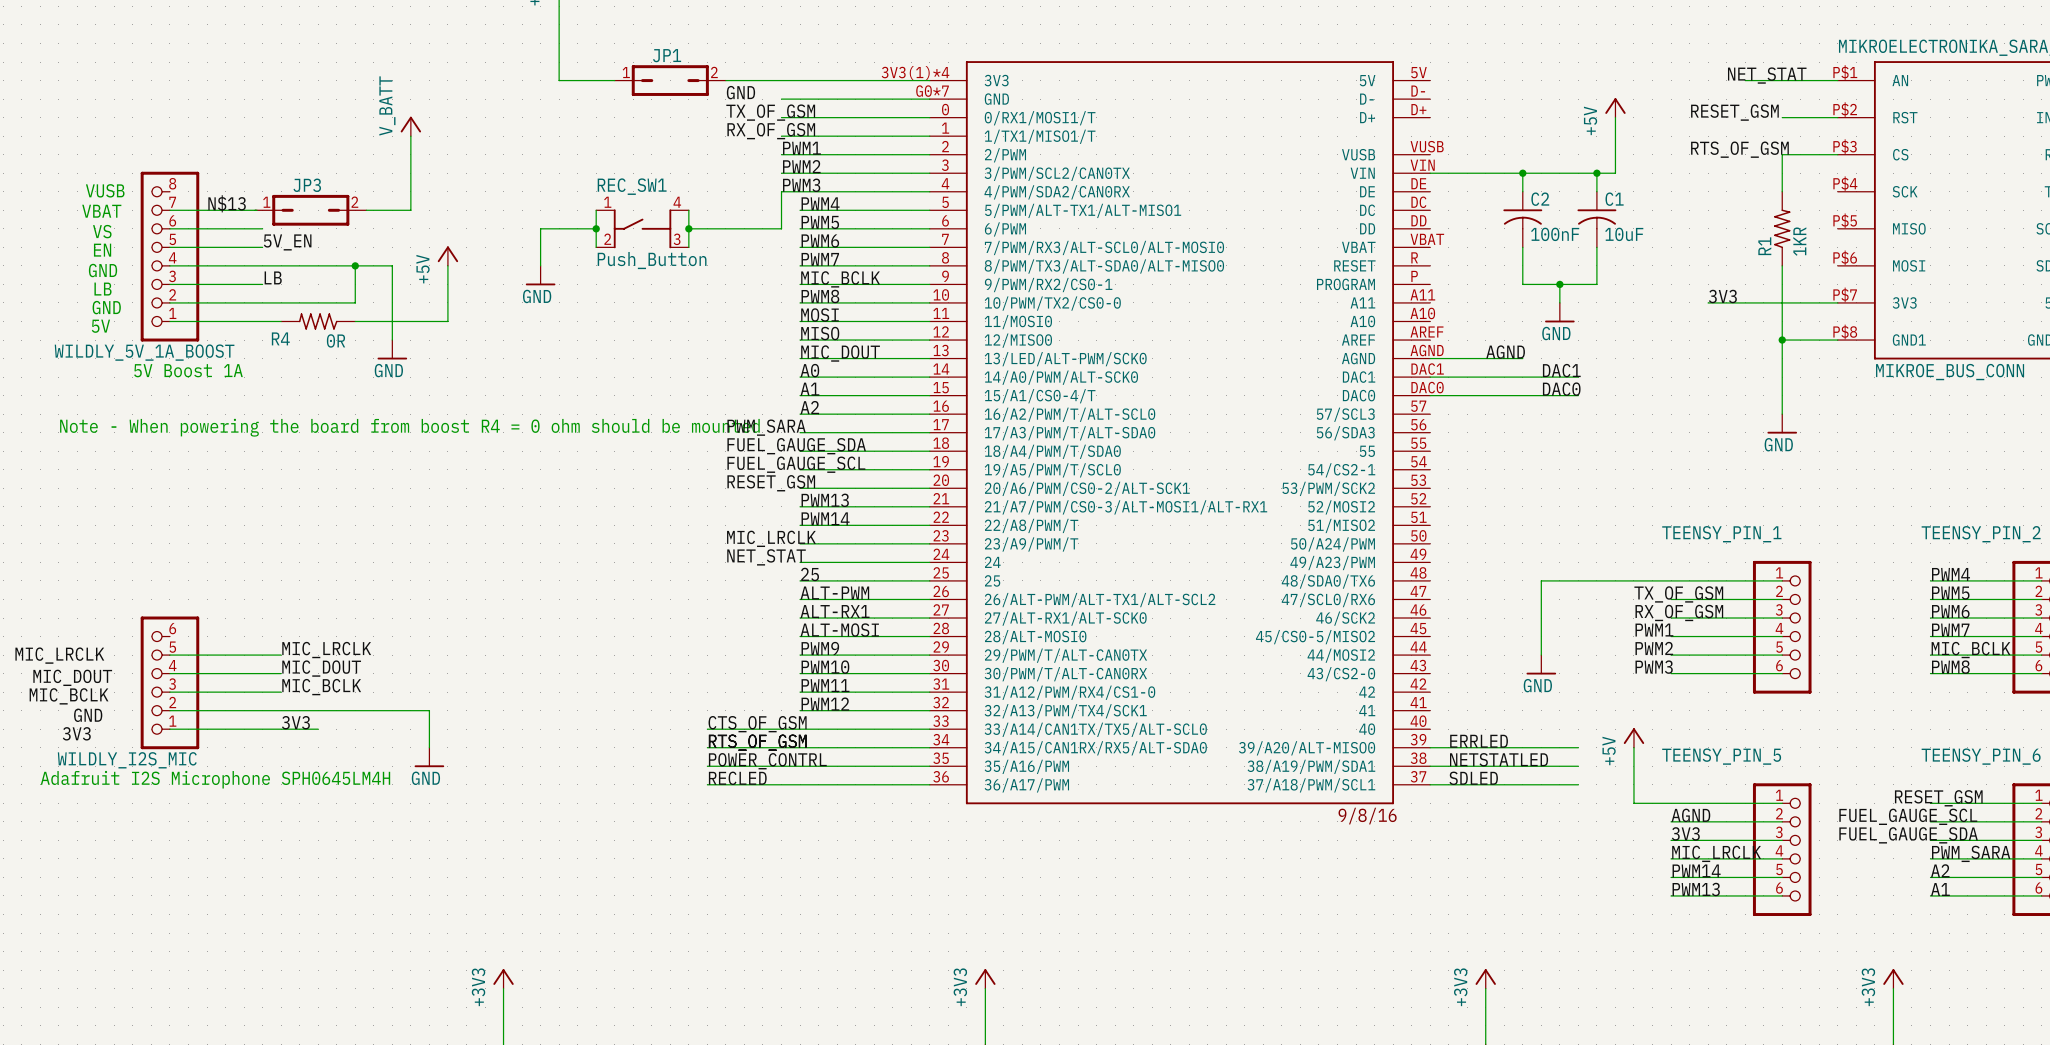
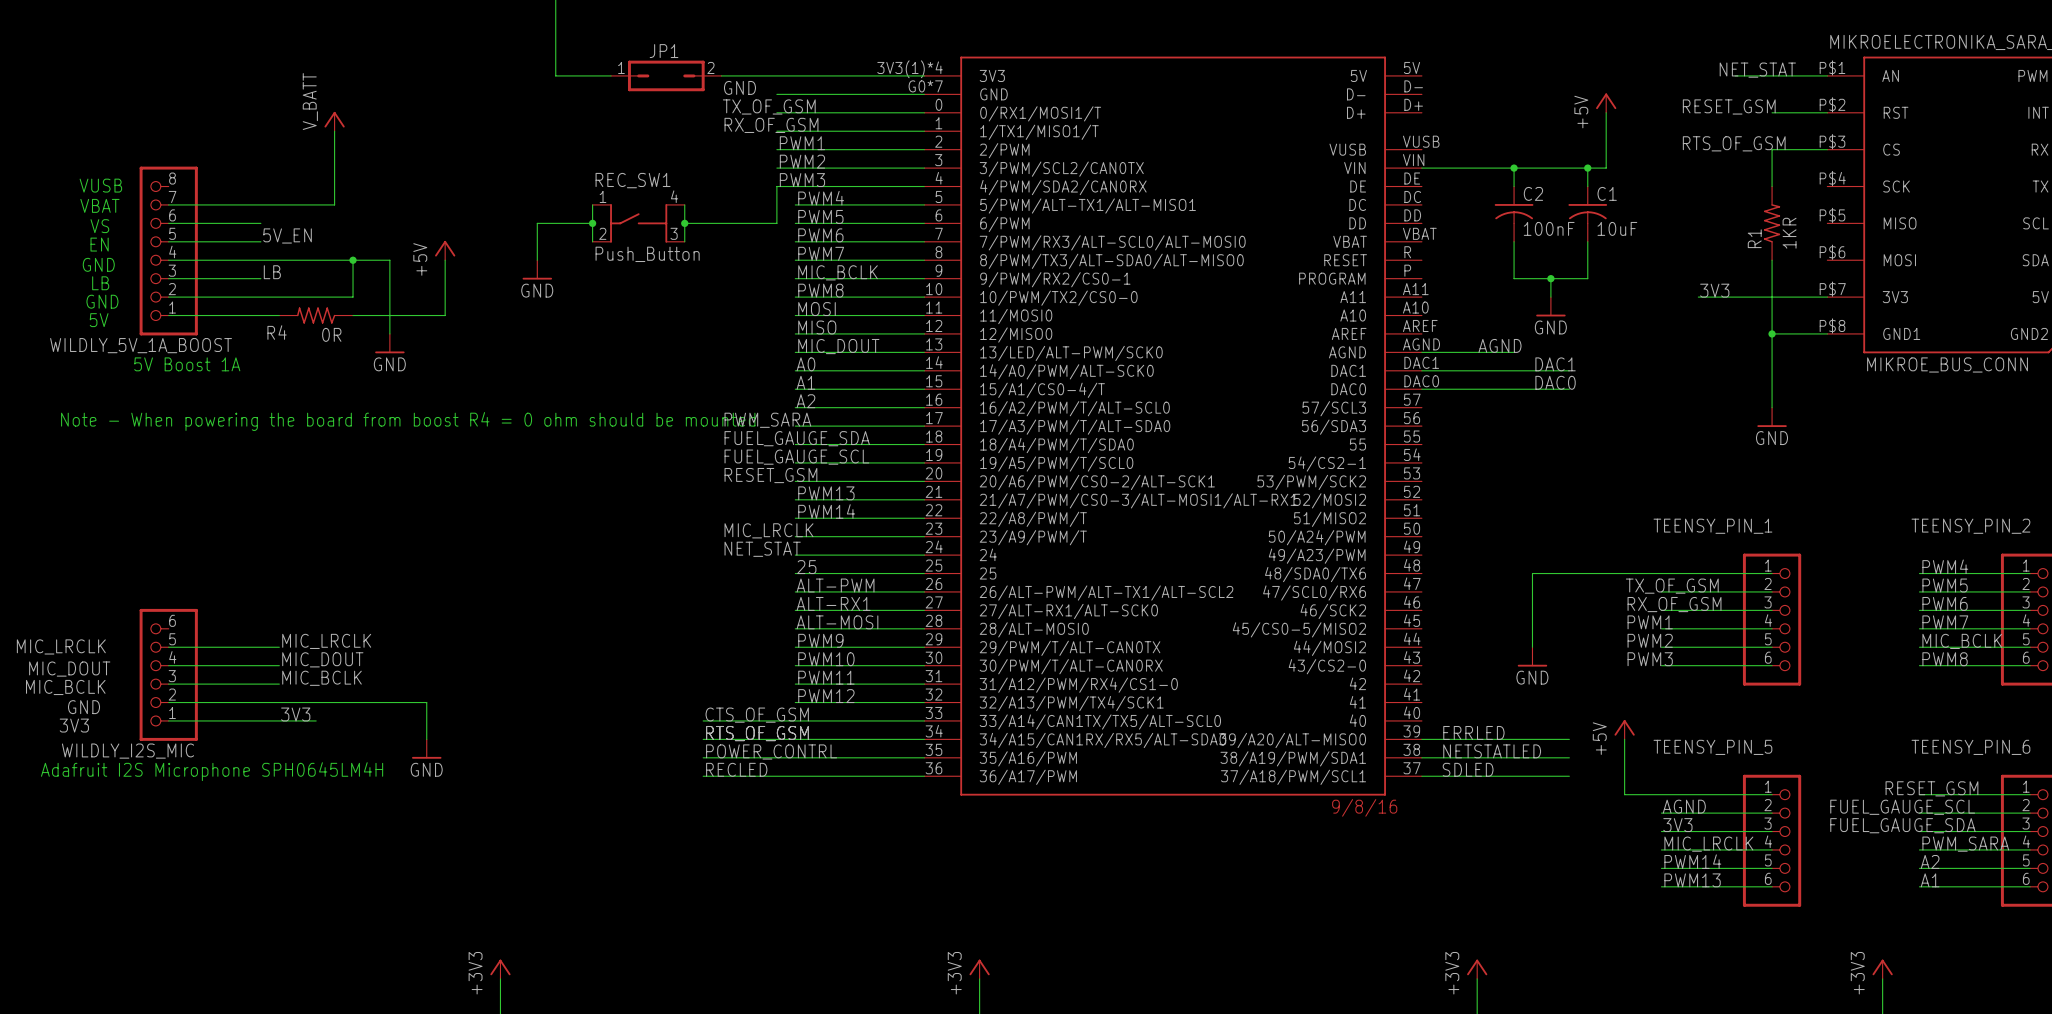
power symbol position: V_BATT (410, 126) -> V_BATT (334, 121)
wire: none -> (334, 131) (334, 204) (255, 204)
wire: (410, 136) (410, 210) (366, 210) -> none
label: N$13 (227, 203) -> none
JP3: (310, 210) -> none

